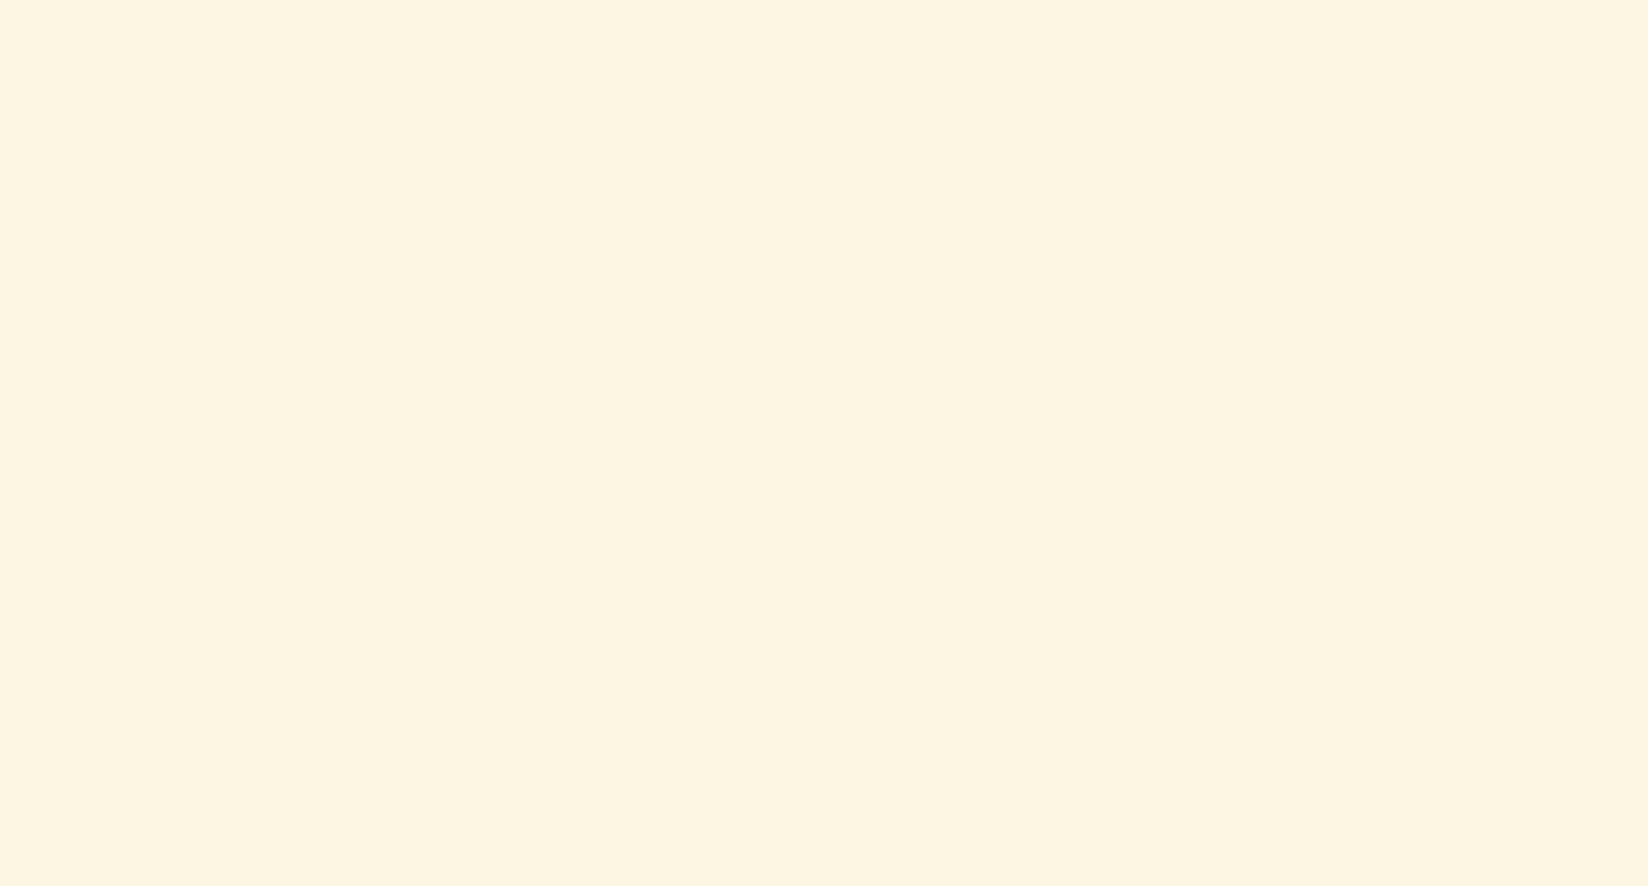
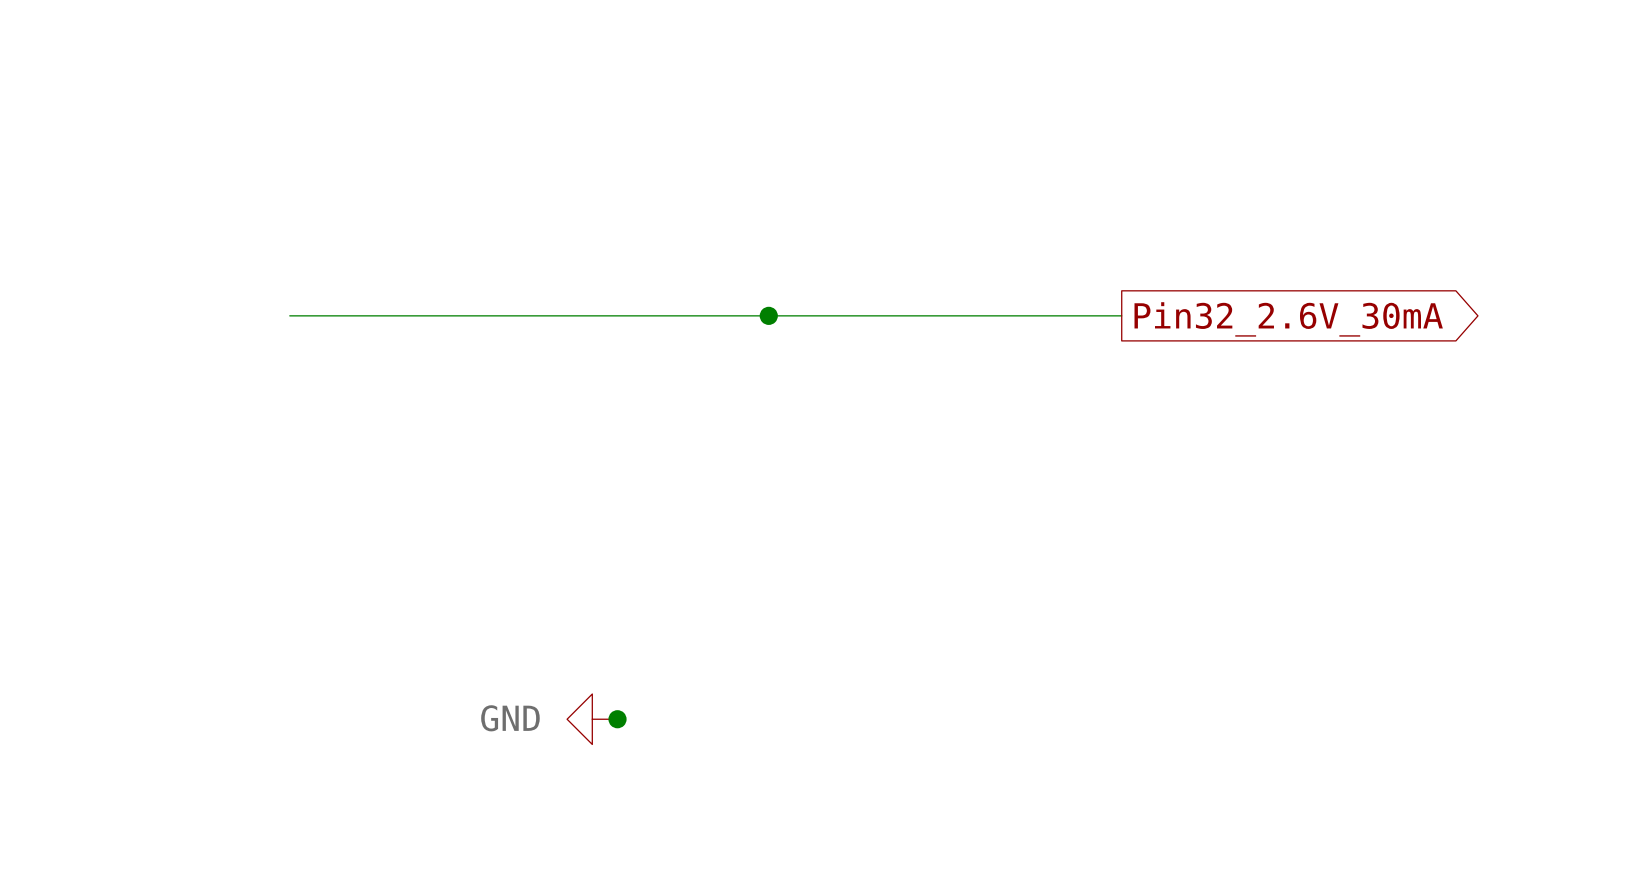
wire: none -> (289, 315) (1121, 315)
junction: none -> (768, 315)
global label: none -> Pin32_2.6V_30mA (1288, 319)
power symbol: none -> GND (592, 719)
junction: none -> (617, 719)

